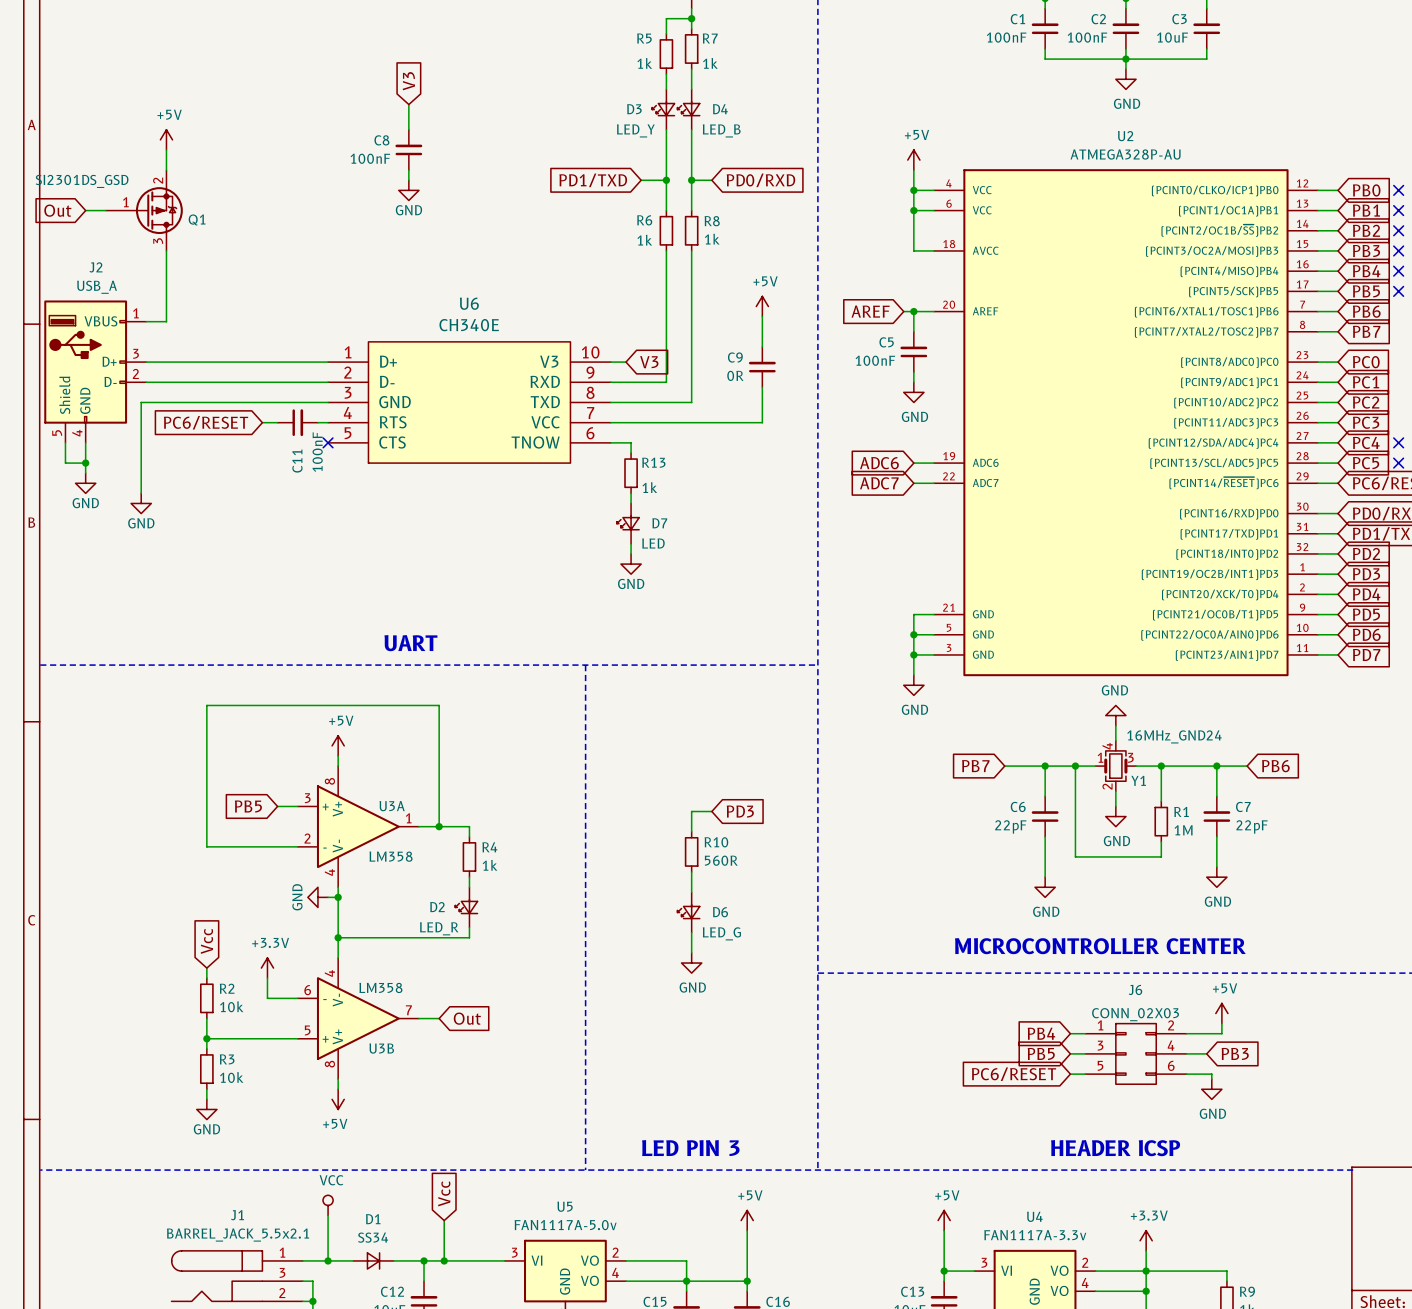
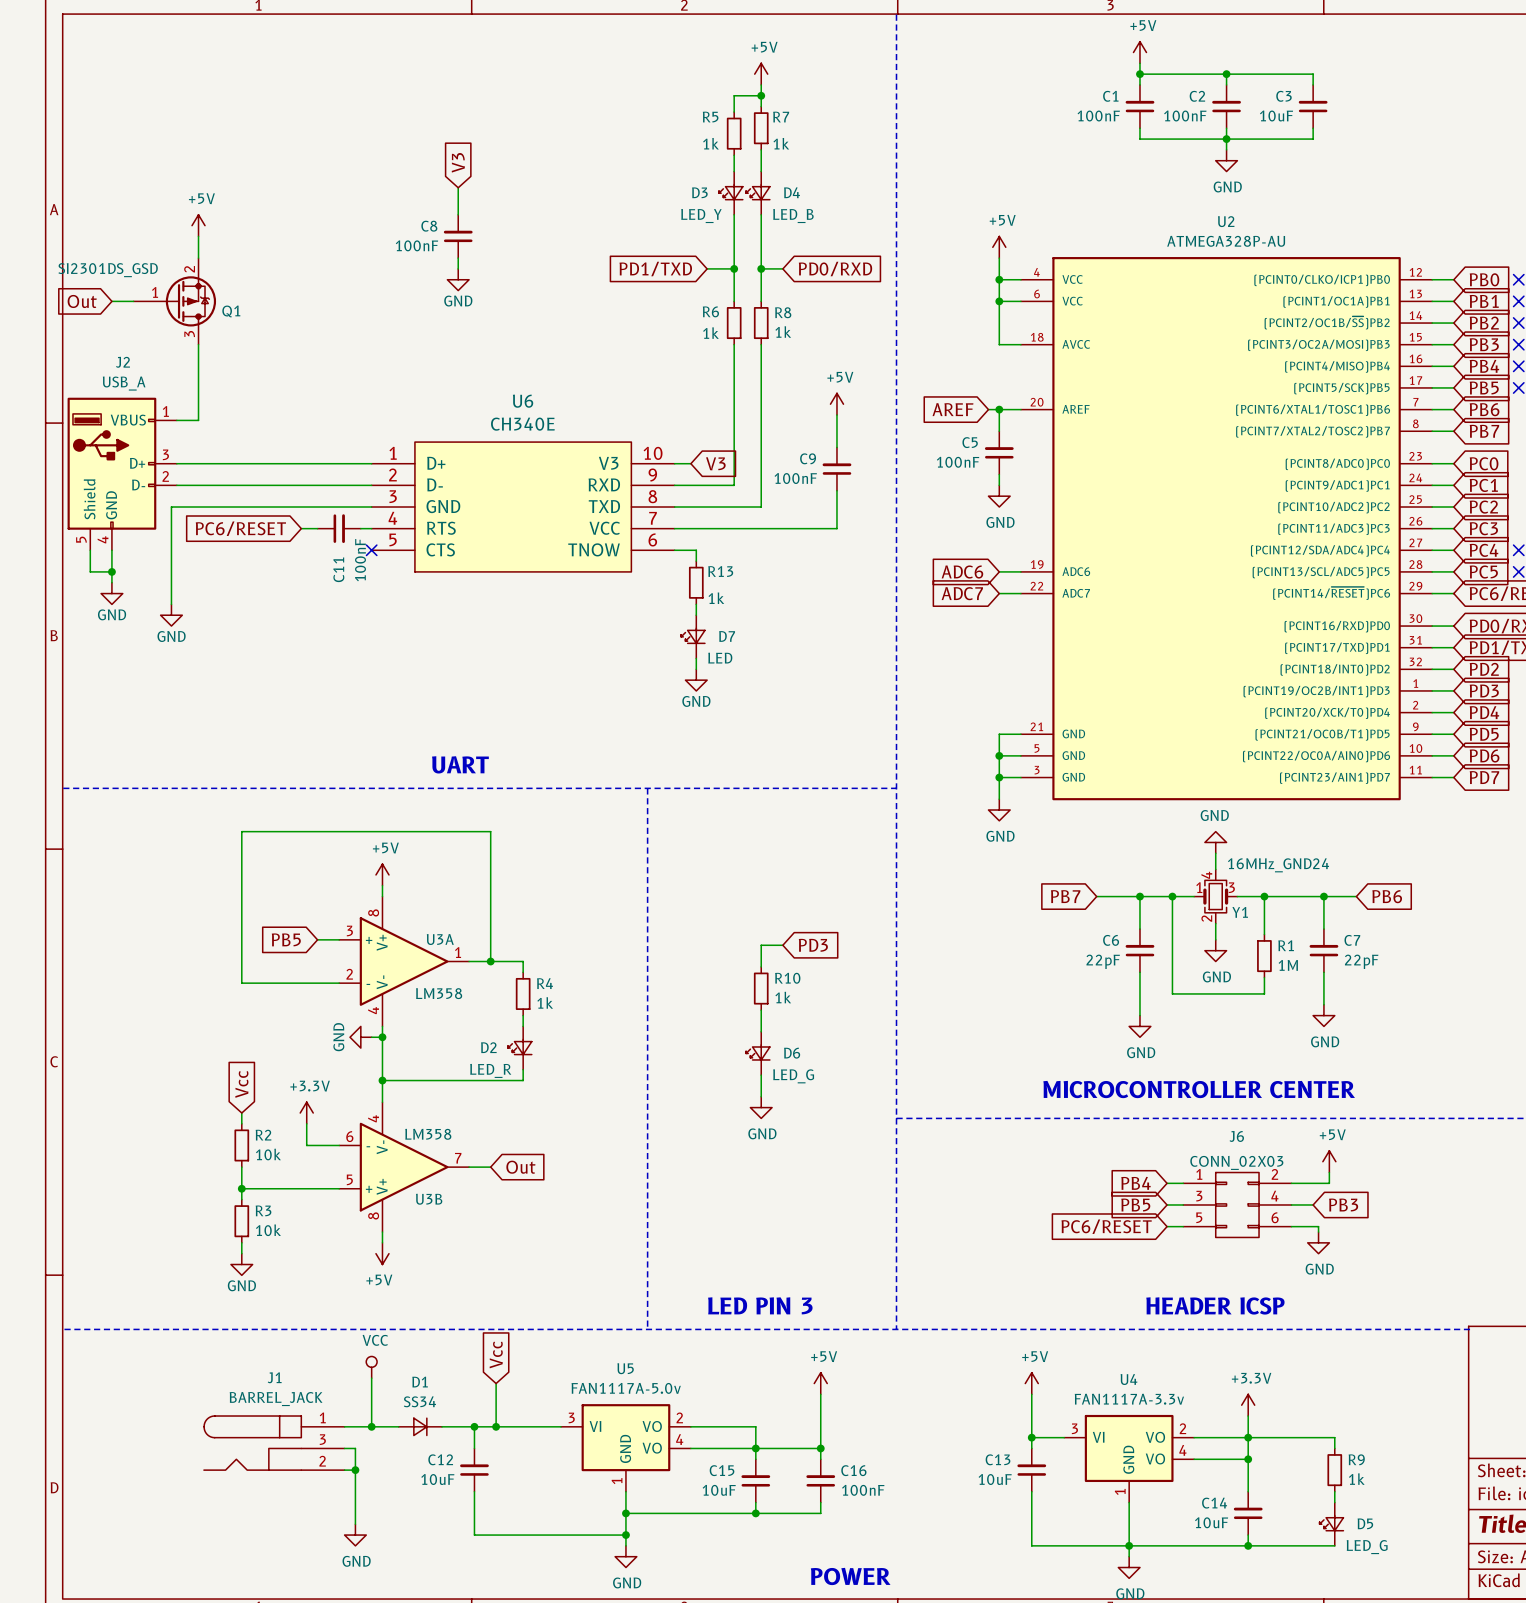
C9 value: 0R (735, 375) -> 100nF (795, 478)
R10 value: 560R (721, 860) -> 1k (783, 997)
J1 value: BARREL_JACK_5.5x2.1 (238, 1235) -> BARREL_JACK (276, 1399)

